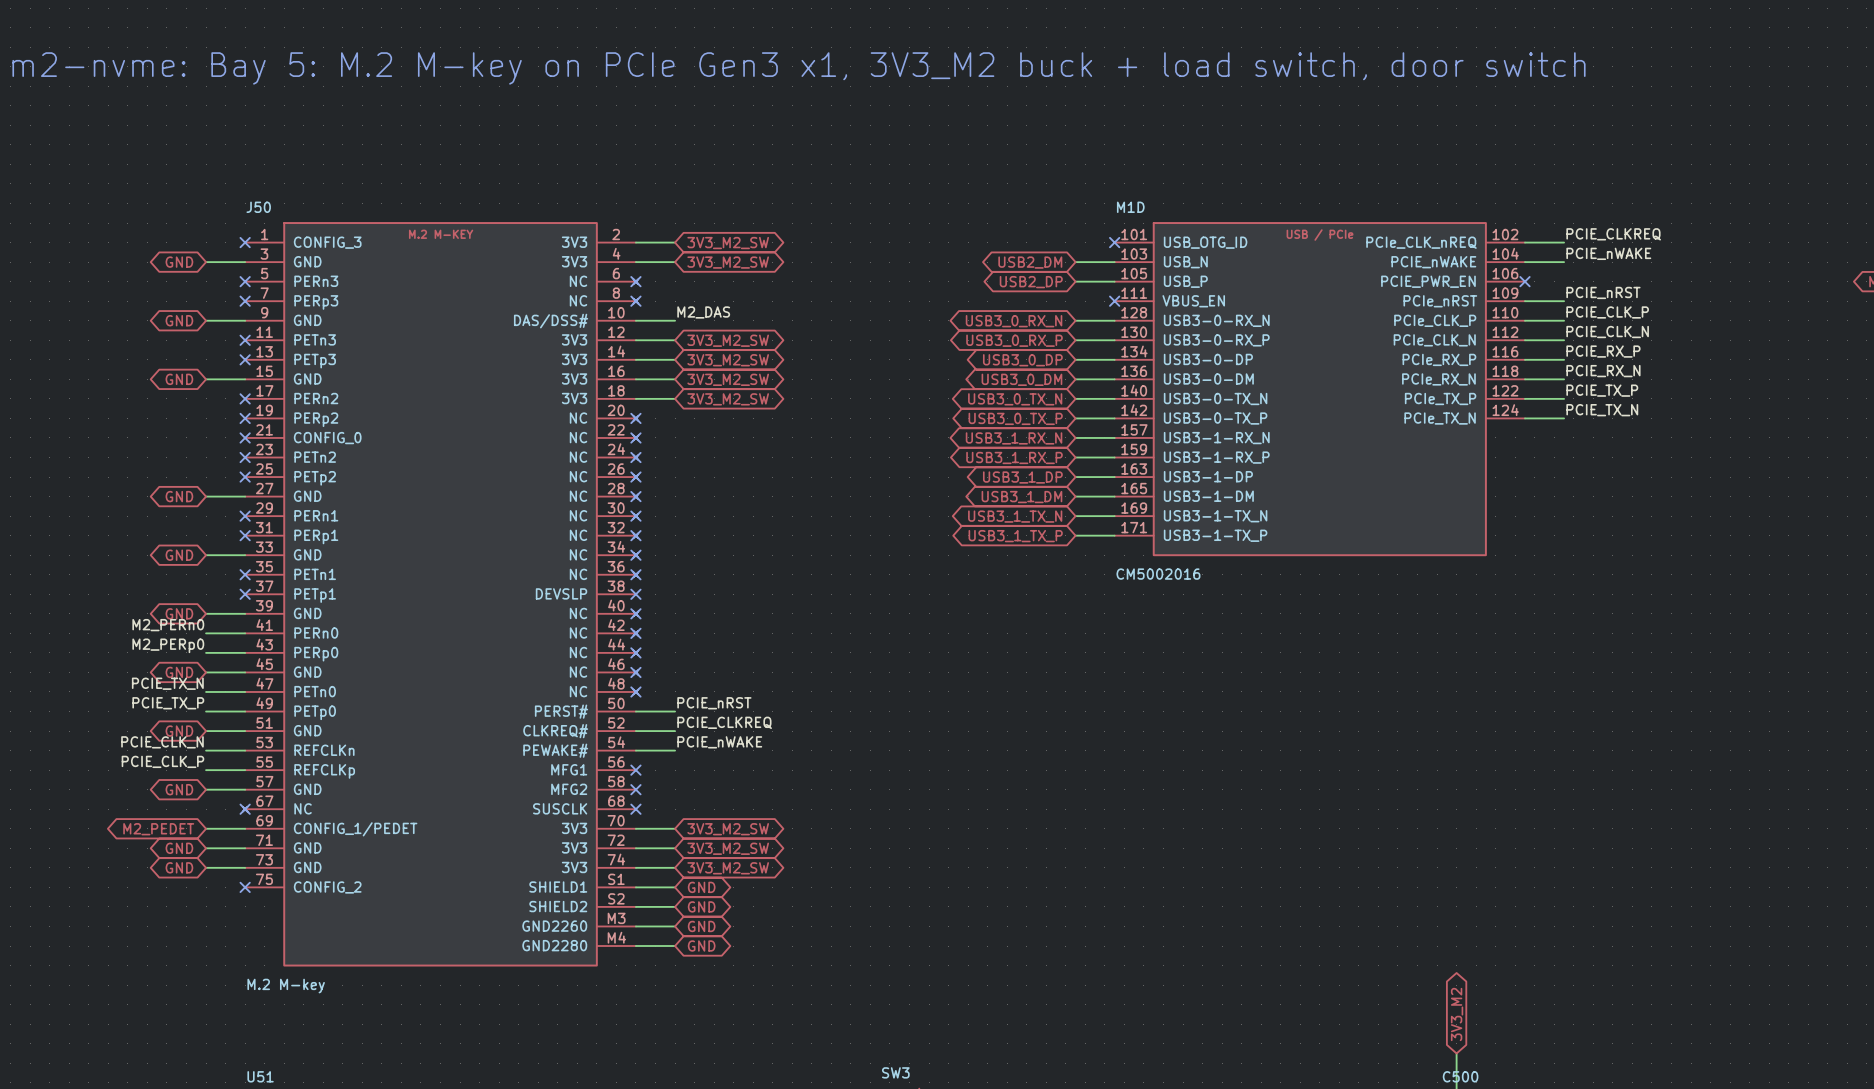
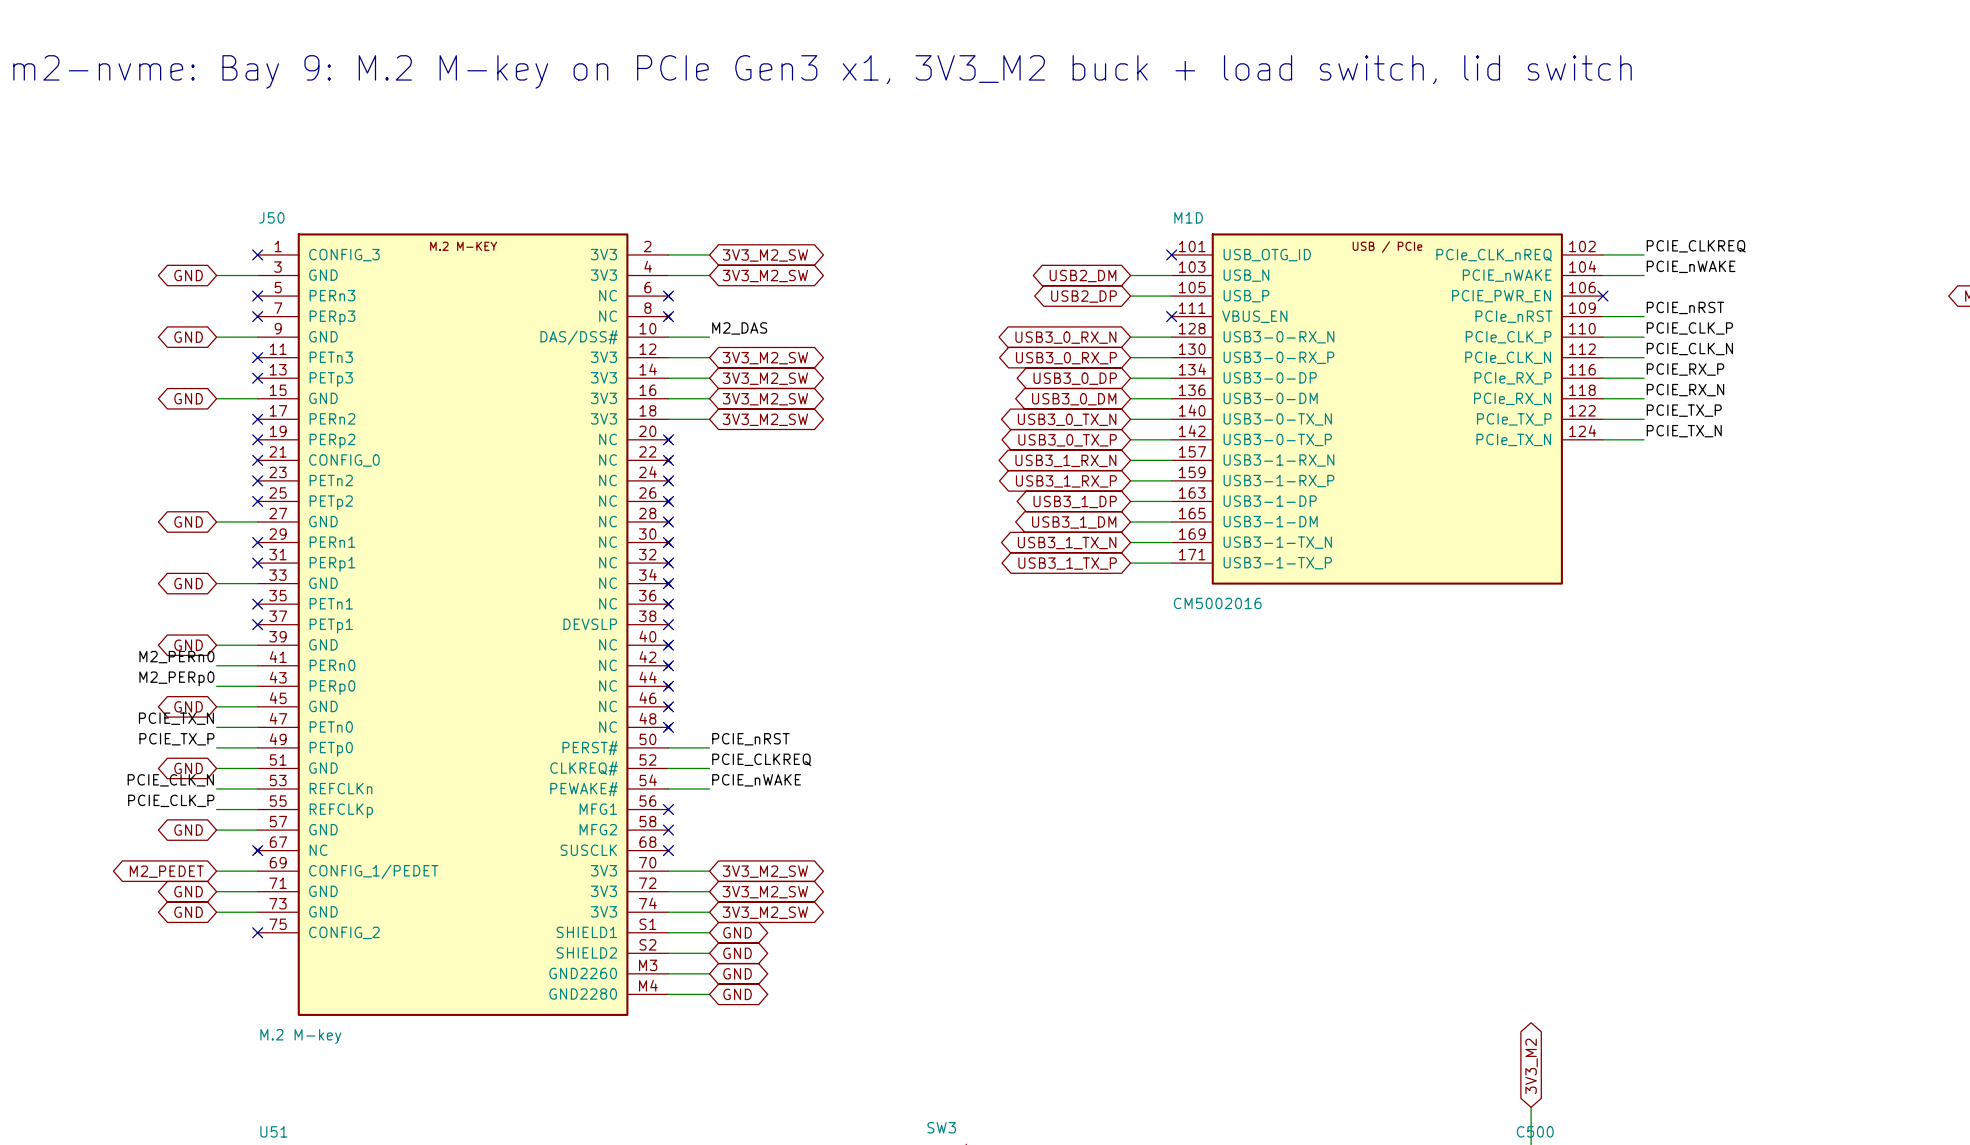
text: m2-nvme: Bay 5: M.2 M-key on PCIe Gen3 x1, 3V3_M2 buck + load switch, door switch (799, 68) -> m2-nvme: Bay 9: M.2 M-key on PCIe Gen3 x1, 3V3_M2 buck + load switch, lid switch (822, 71)

